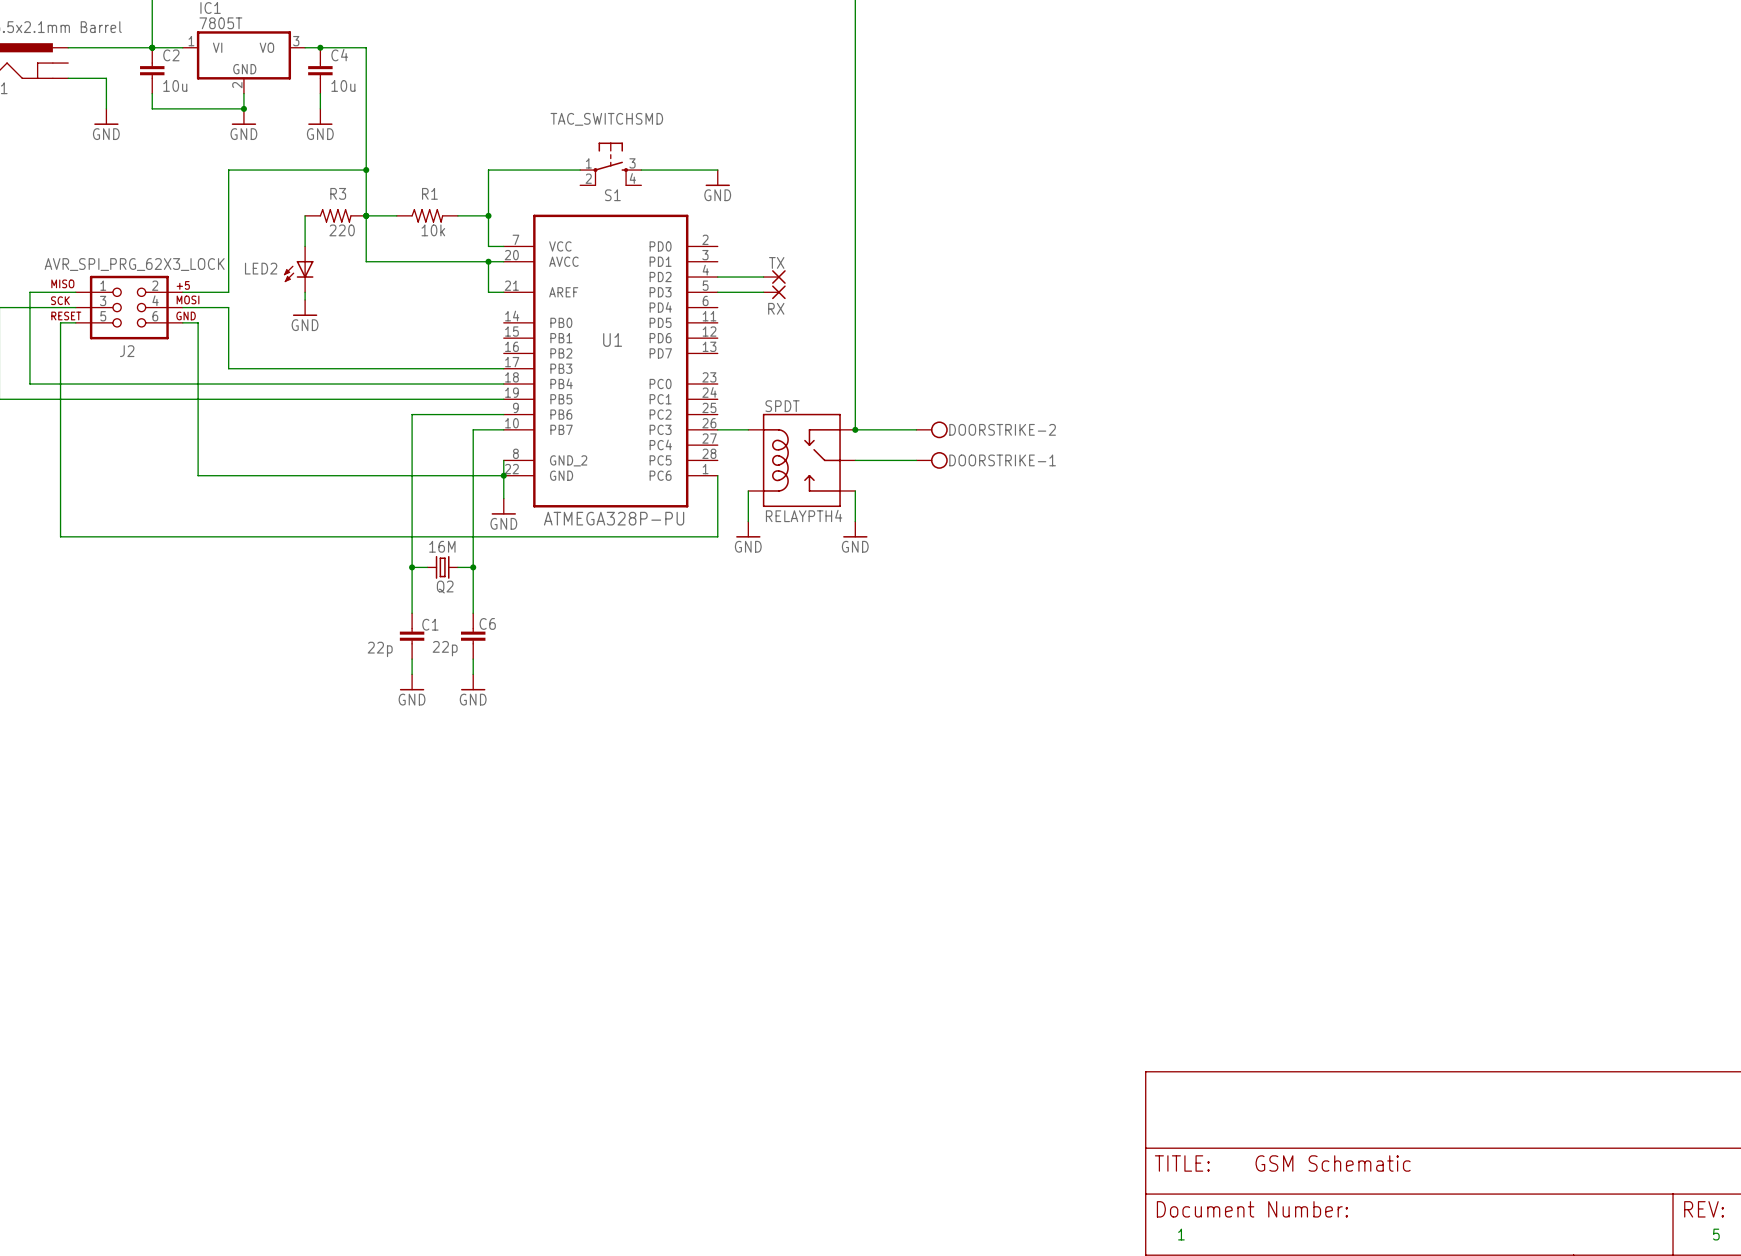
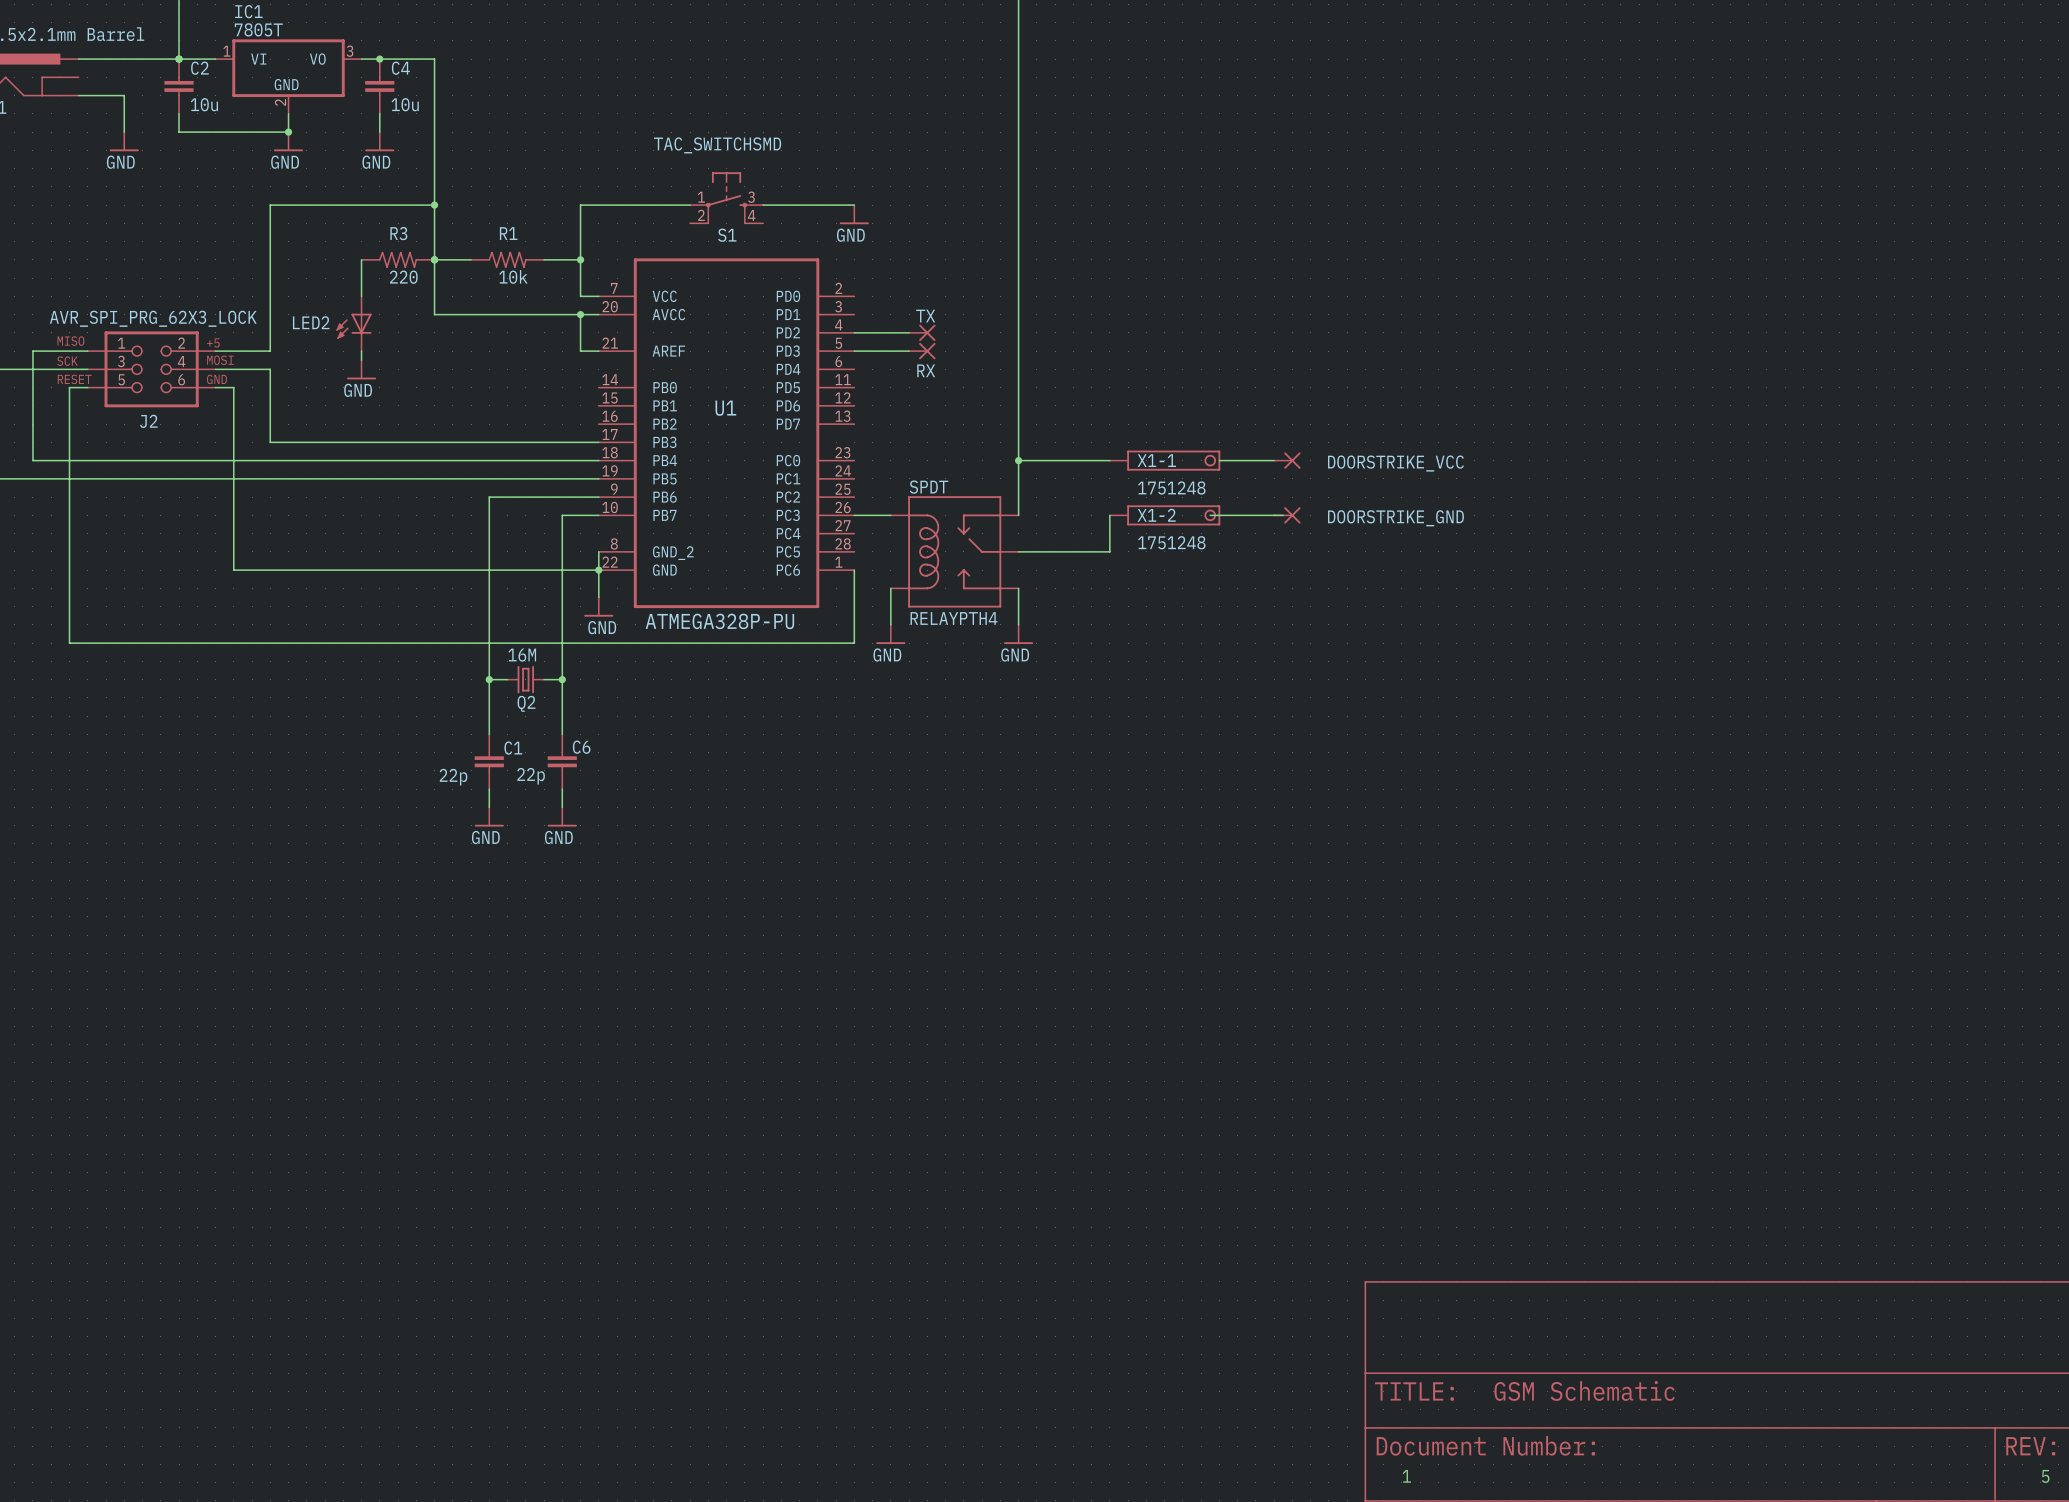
wire: none -> (1018, 460) (1109, 460)
junction: none -> (1018, 460)
X1-1: none -> 1751248 (1165, 460)
wire: none -> (1219, 460) (1274, 460)
DOORSTRIKE_VCC: none -> (1287, 460)
wire: (855, 429) (916, 429) -> none
junction: (855, 429) -> none
wire: none -> (1109, 515) (1109, 551) (1091, 551)
DOORSTRIKE-2: (932, 429) -> none
X1-2: none -> 1751248 (1165, 515)
wire: none -> (1210, 515) (1283, 515)
DOORSTRIKE_GND: none -> (1287, 515)
DOORSTRIKE-1: (932, 460) -> none

